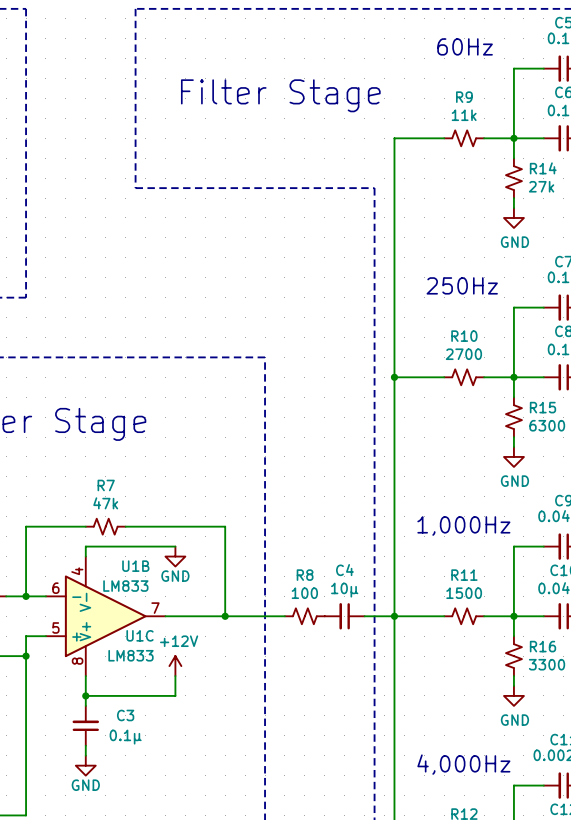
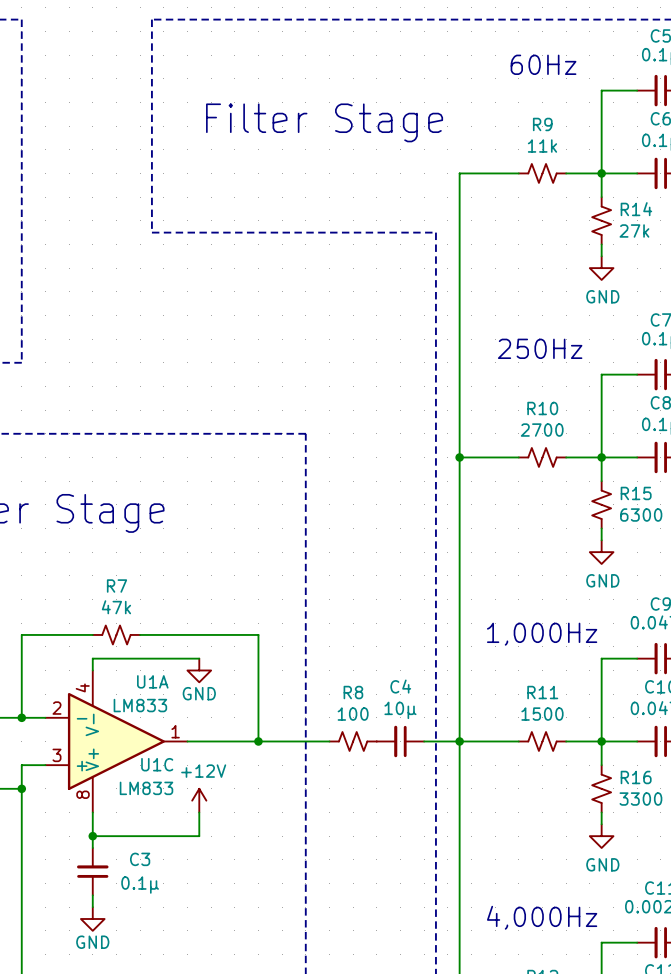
U1B name: U1B (135, 566) -> U1A (152, 681)
U1B pin number: 6 (55, 588) -> 2 (56, 708)
U1B pin number: 7 (155, 608) -> 1 (175, 731)
U1B pin number: 5 (55, 627) -> 3 (56, 755)

